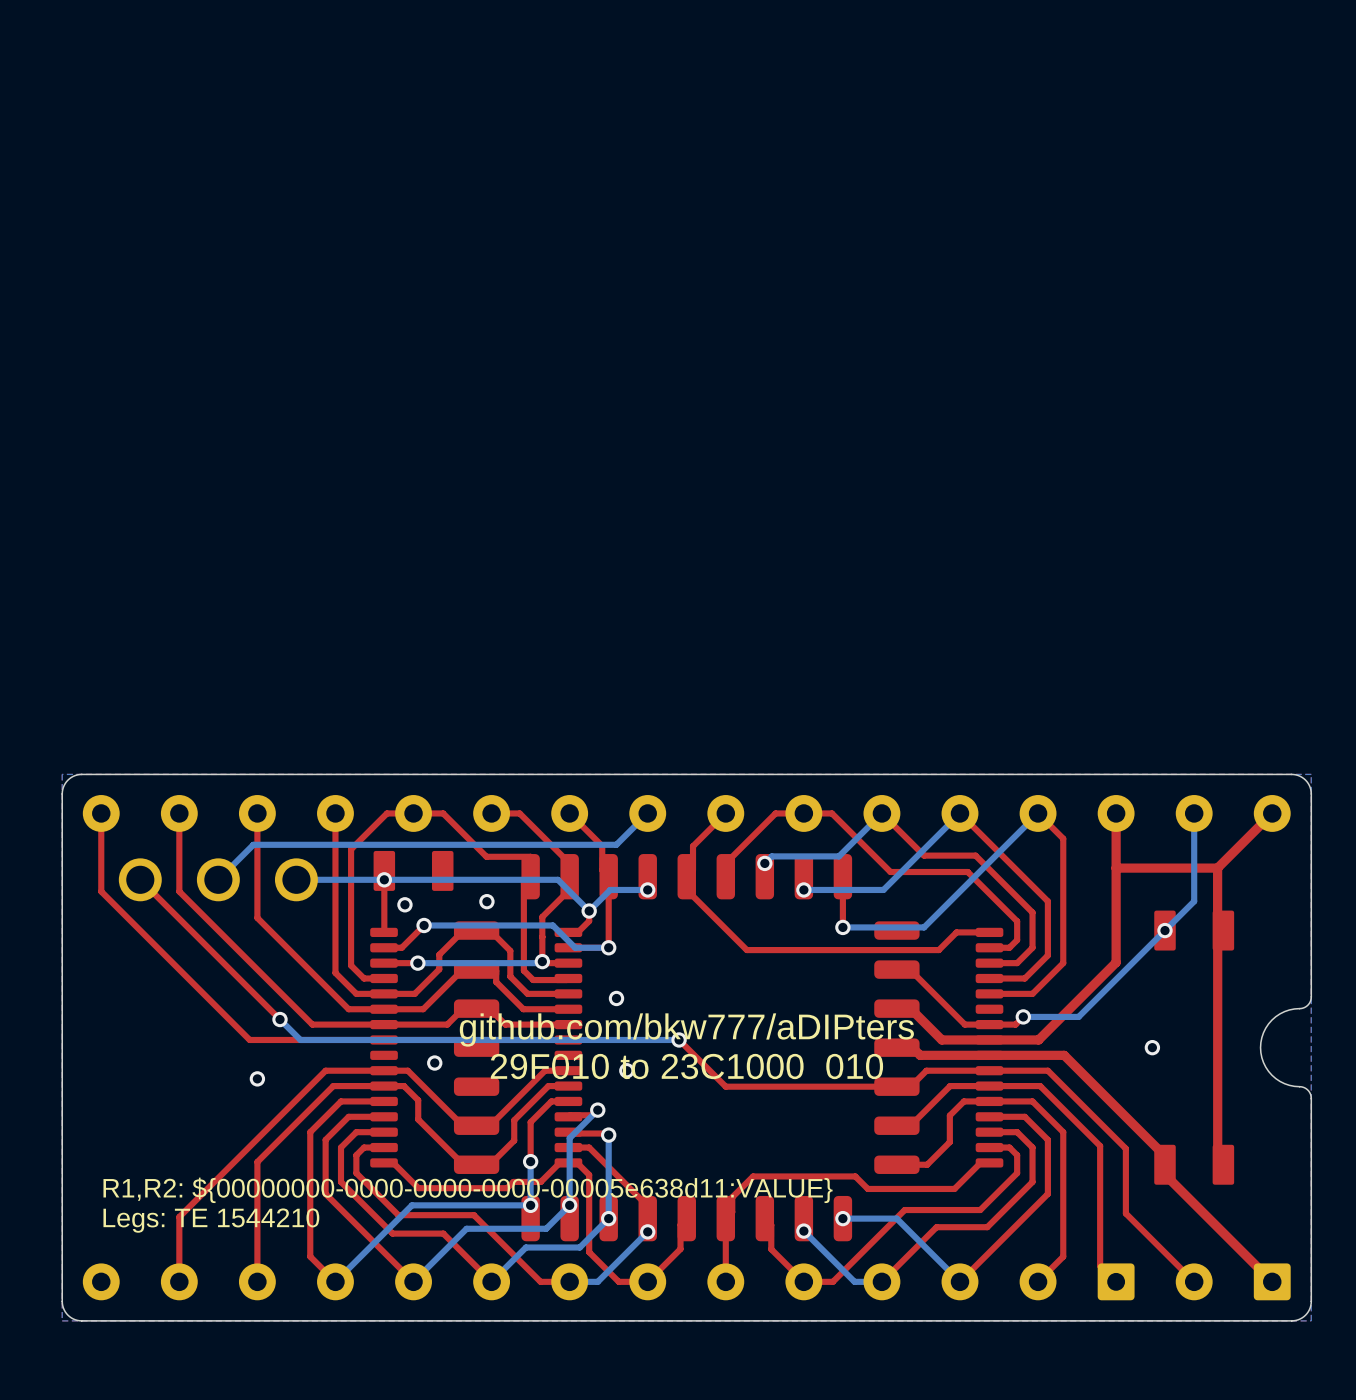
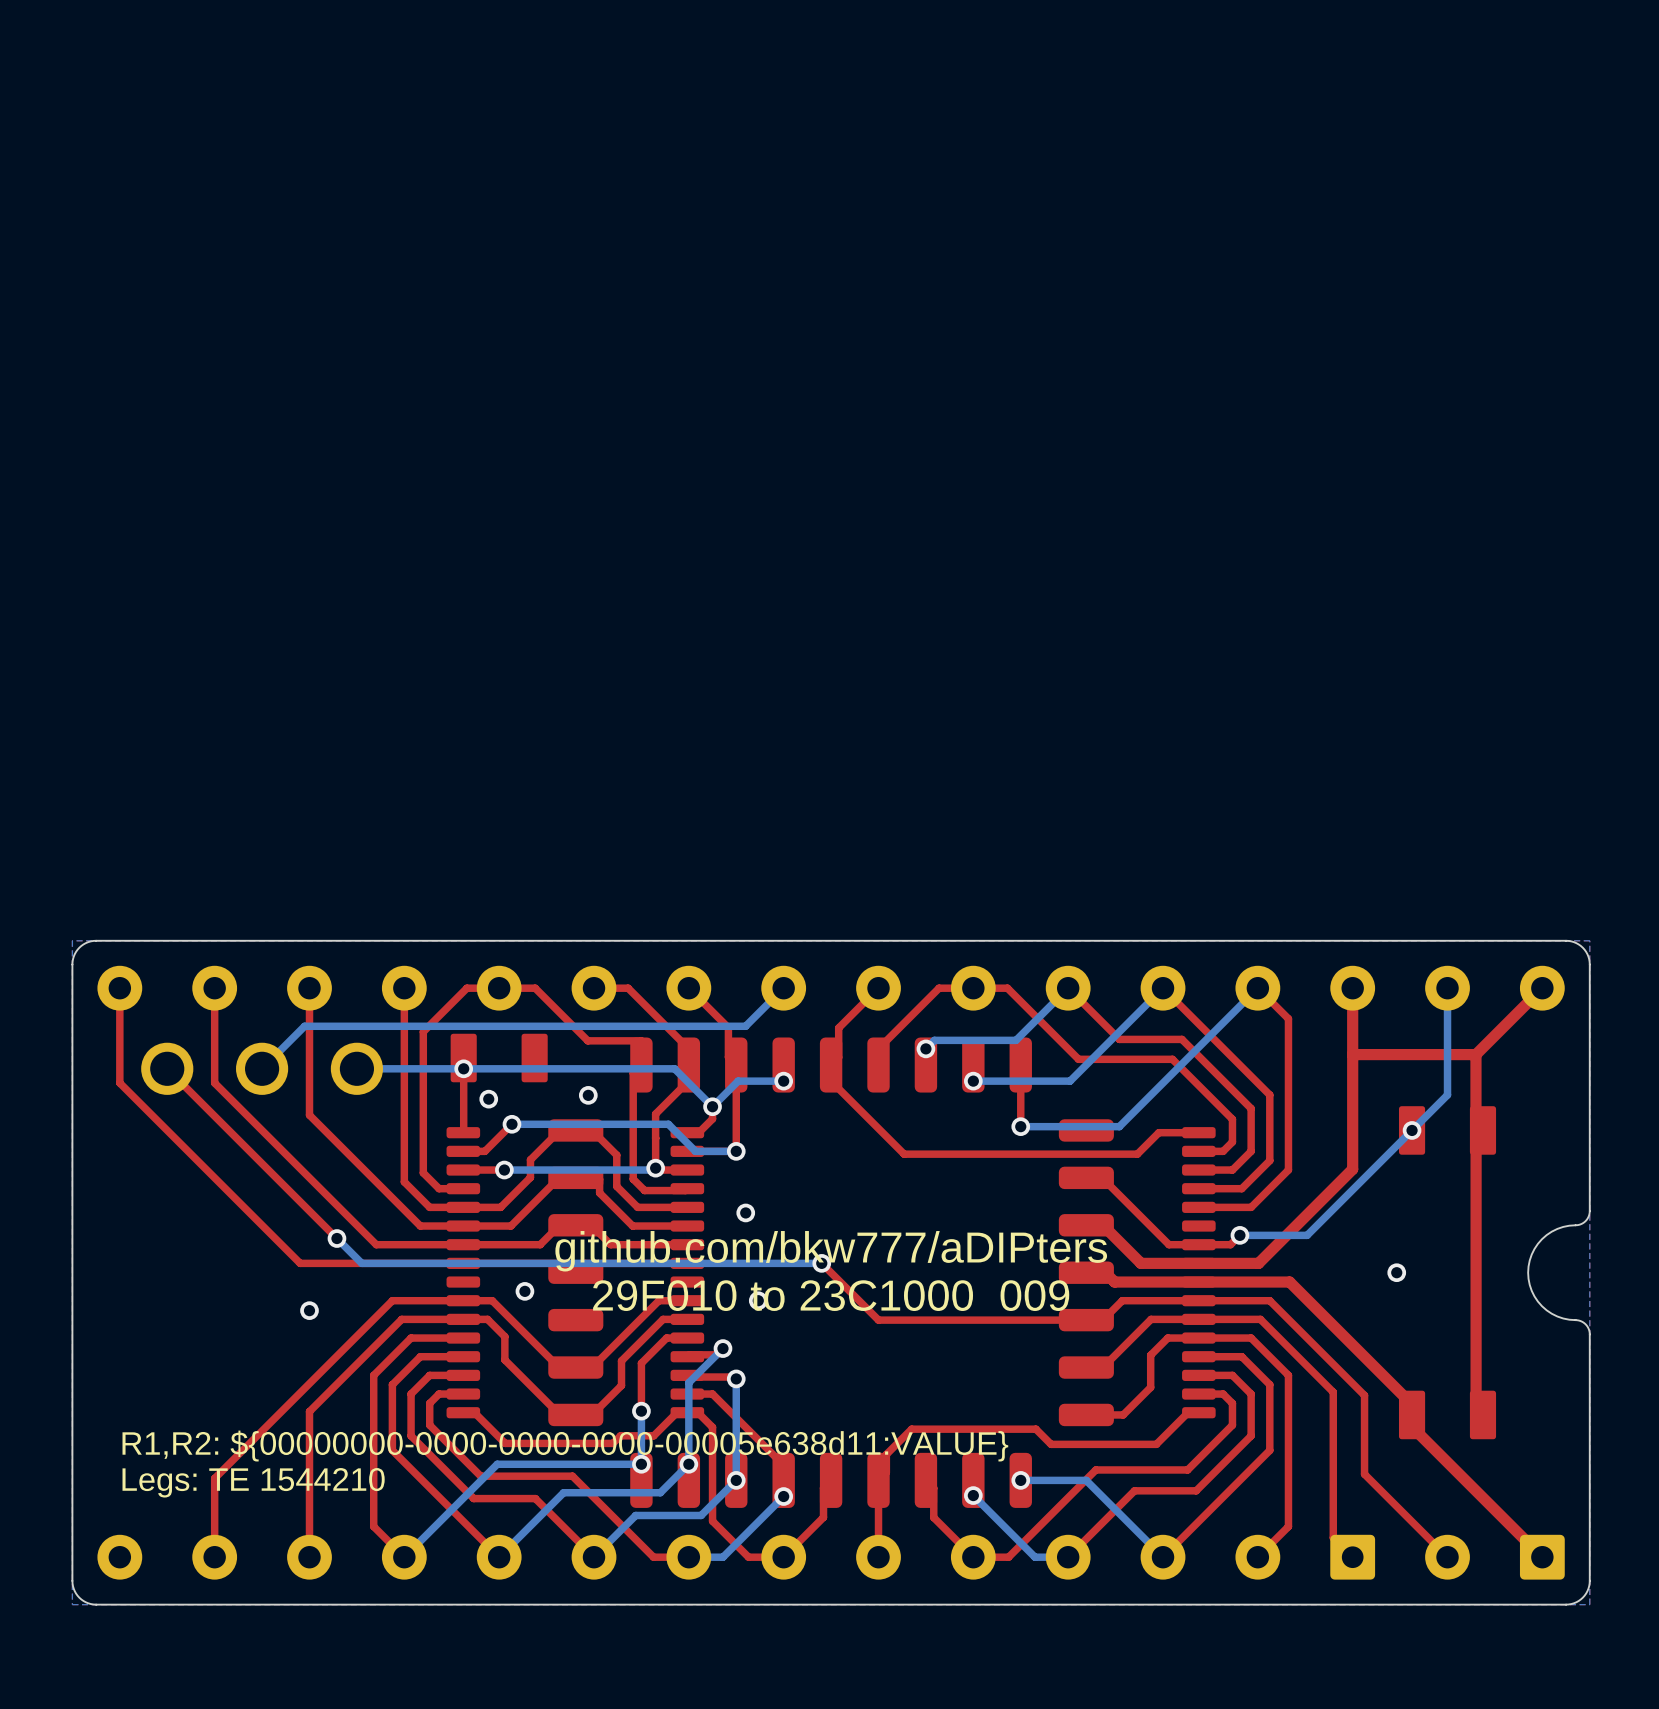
text: 29F010 to 23C1000 010 (686, 1066) -> 29F010 to 23C1000 009 (831, 1295)

